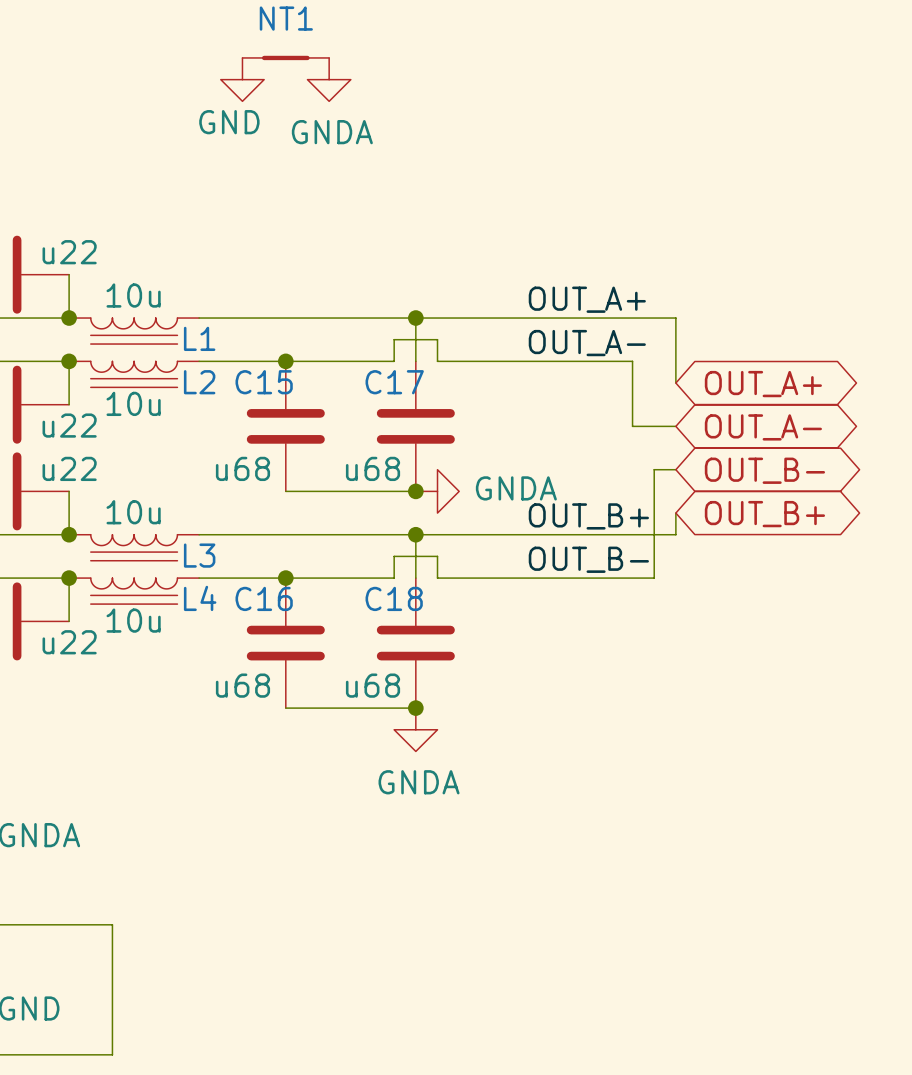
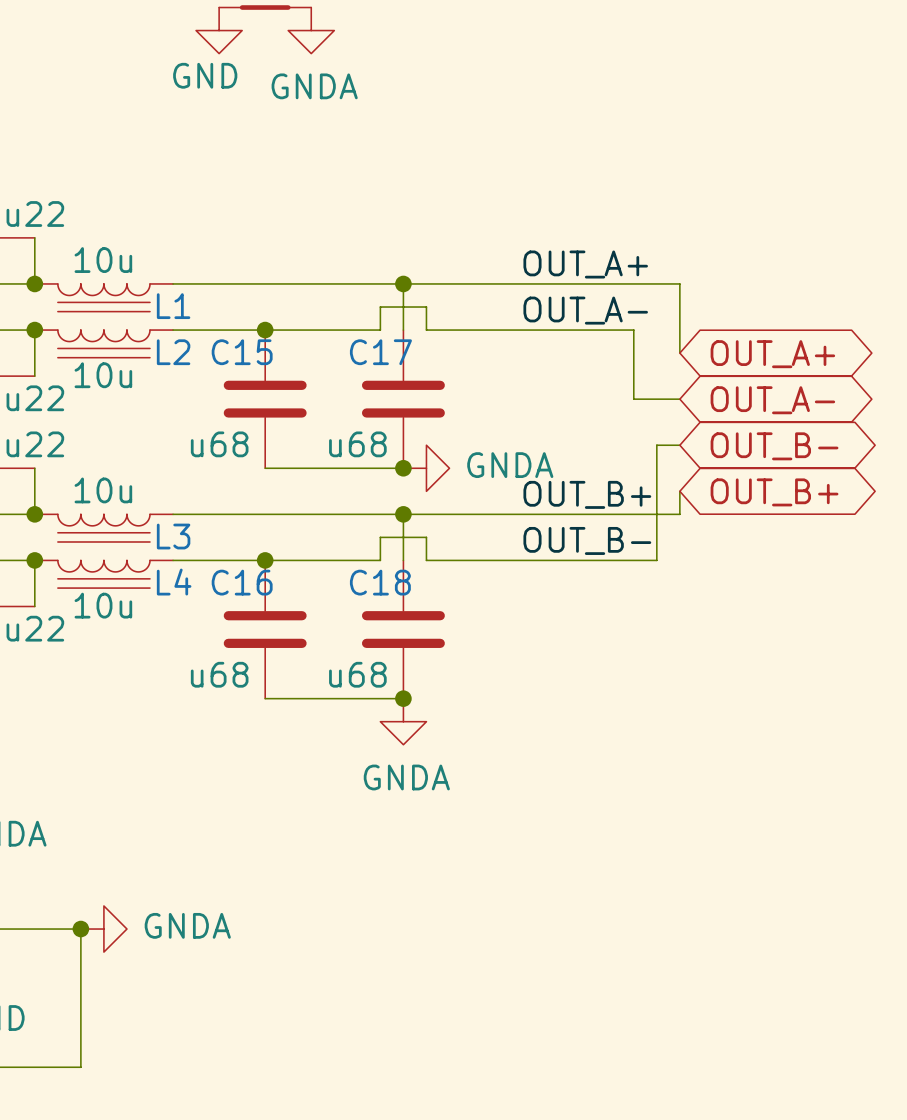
junction: none -> (80, 929)
power symbol: none -> GNDA (103, 929)

